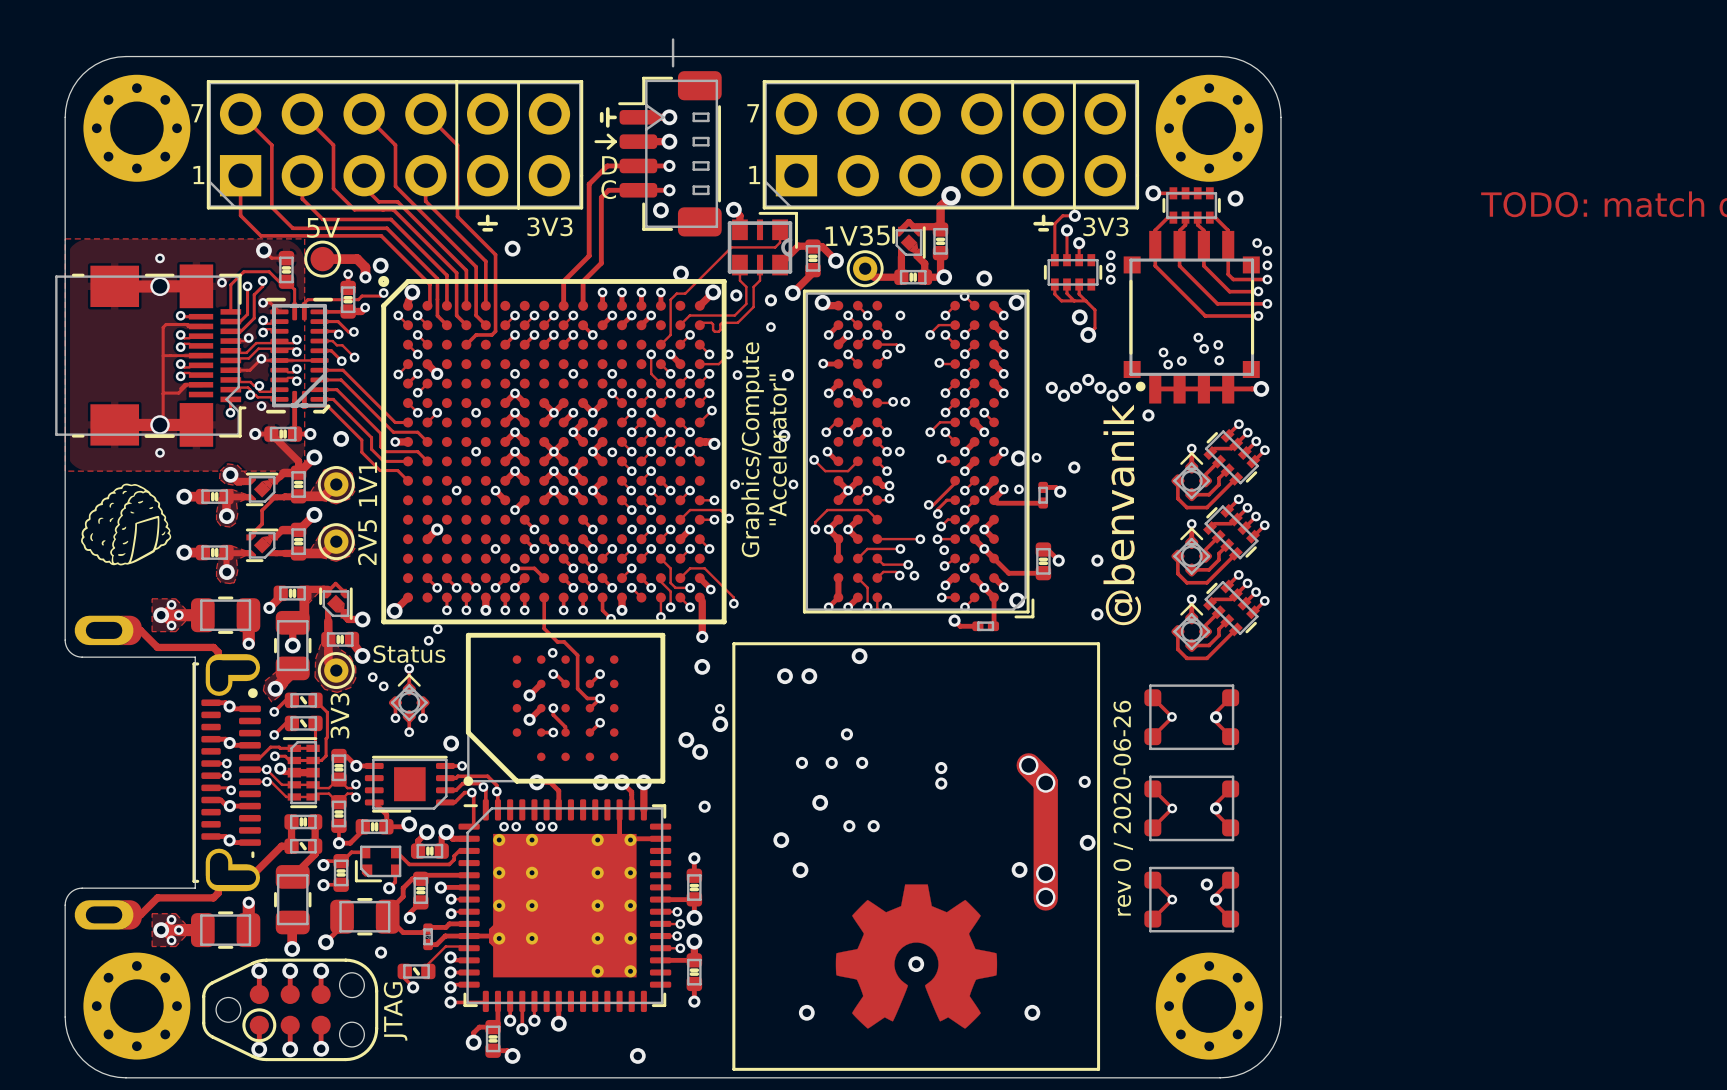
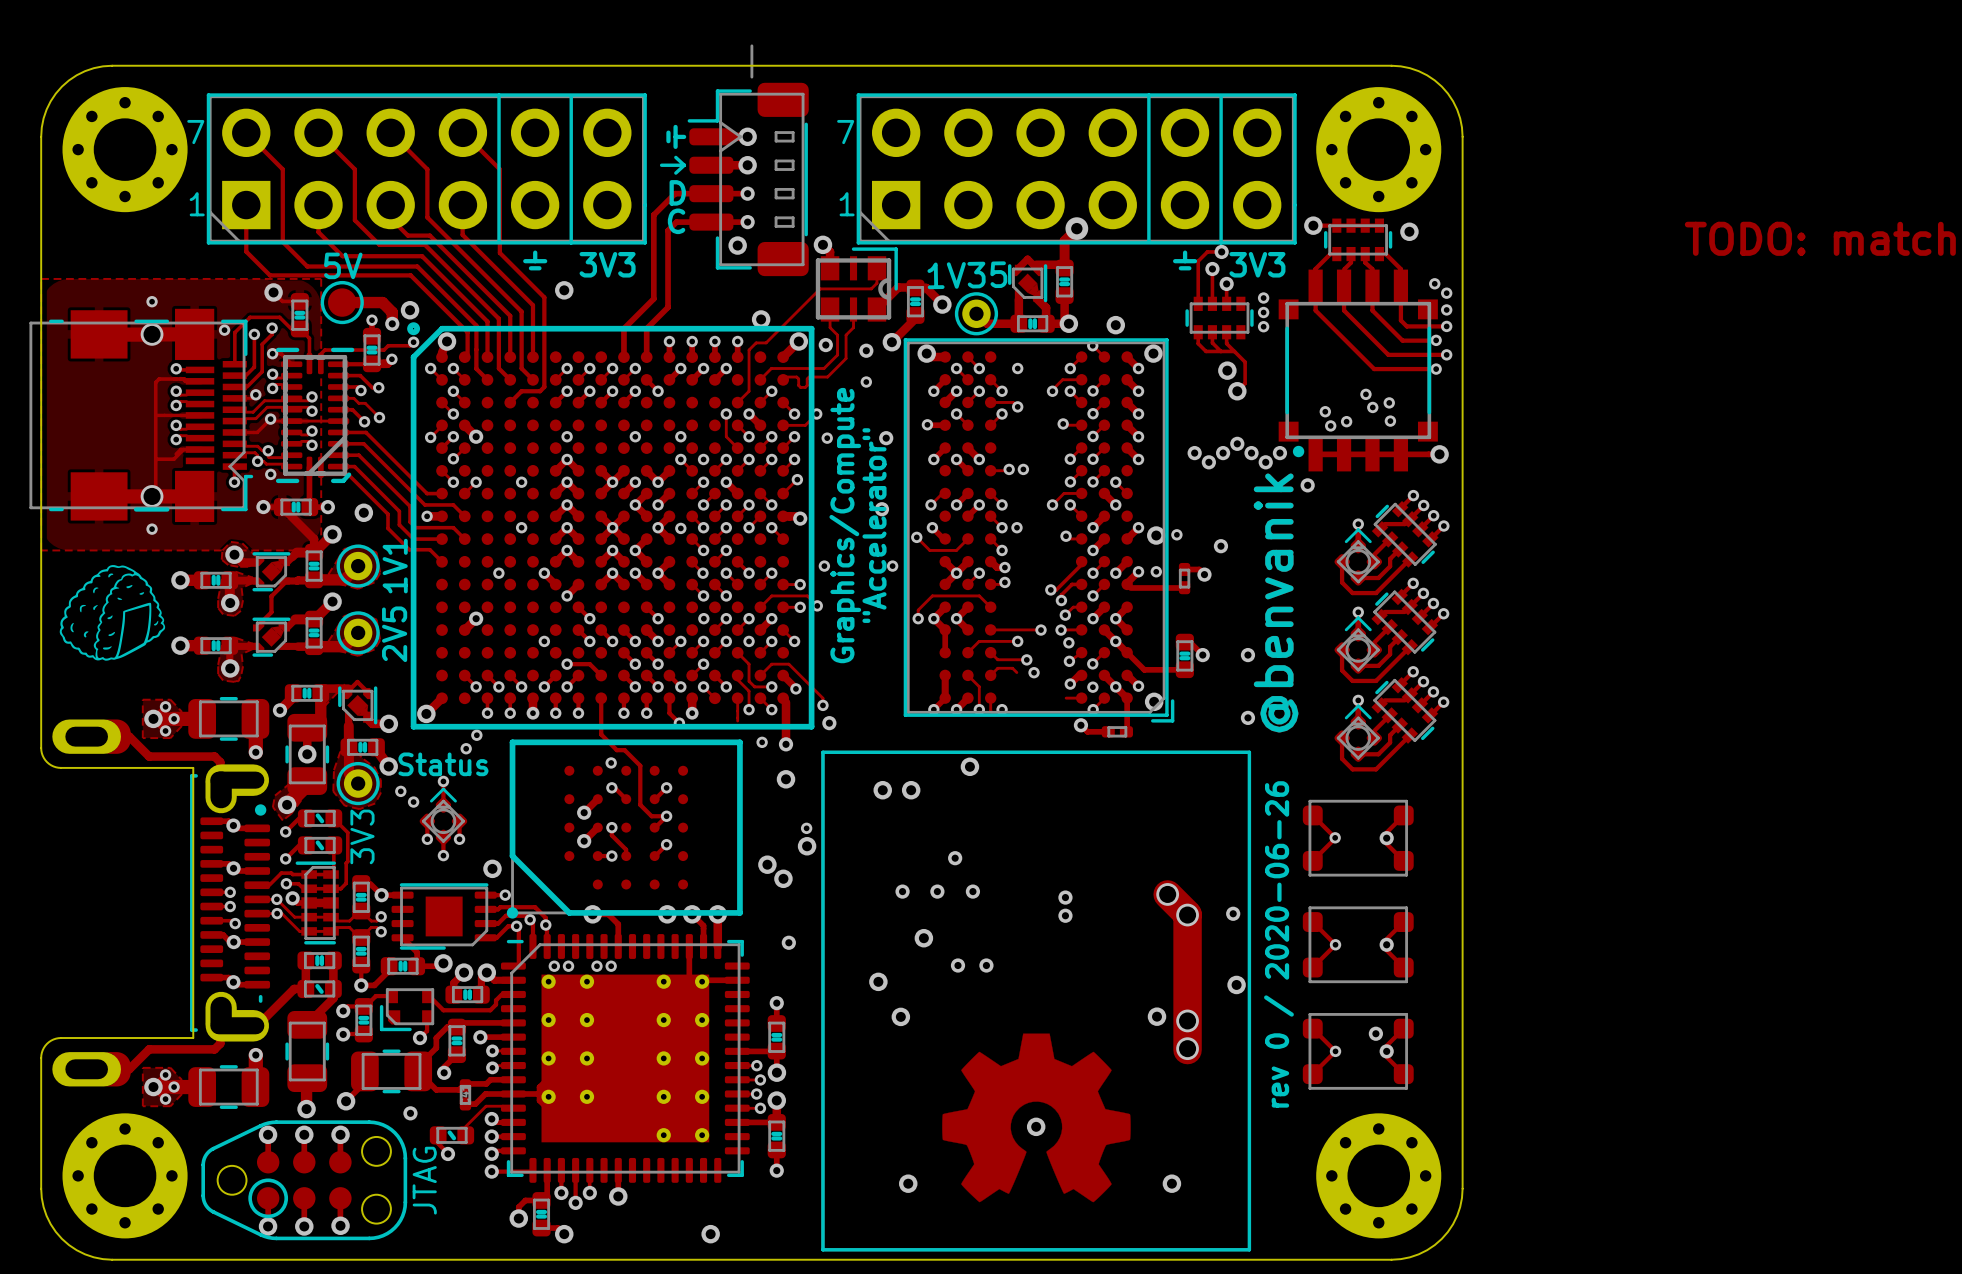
via: (899, 575) -> none
via position: (941, 597) -> (1092, 687)
via position: (660, 617) -> (762, 742)
via: none -> (829, 723)

